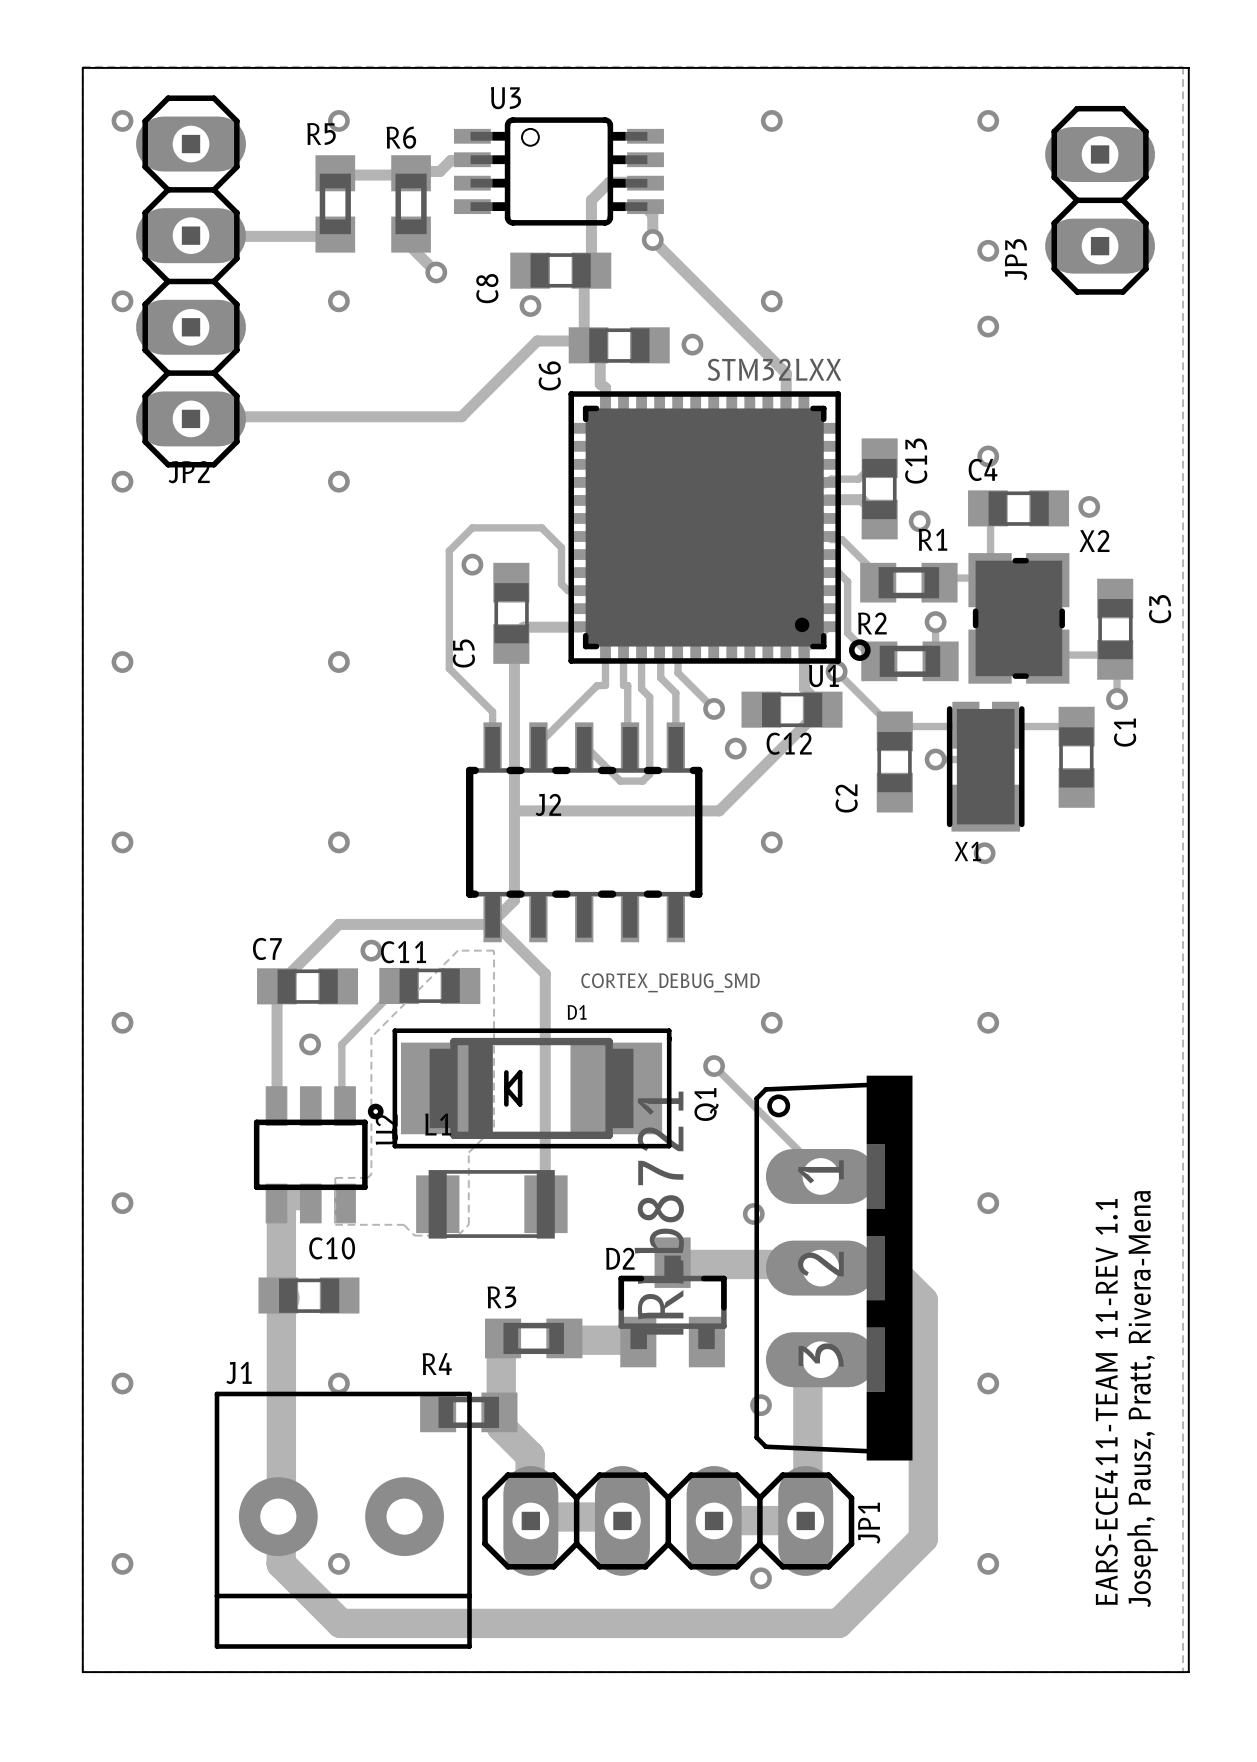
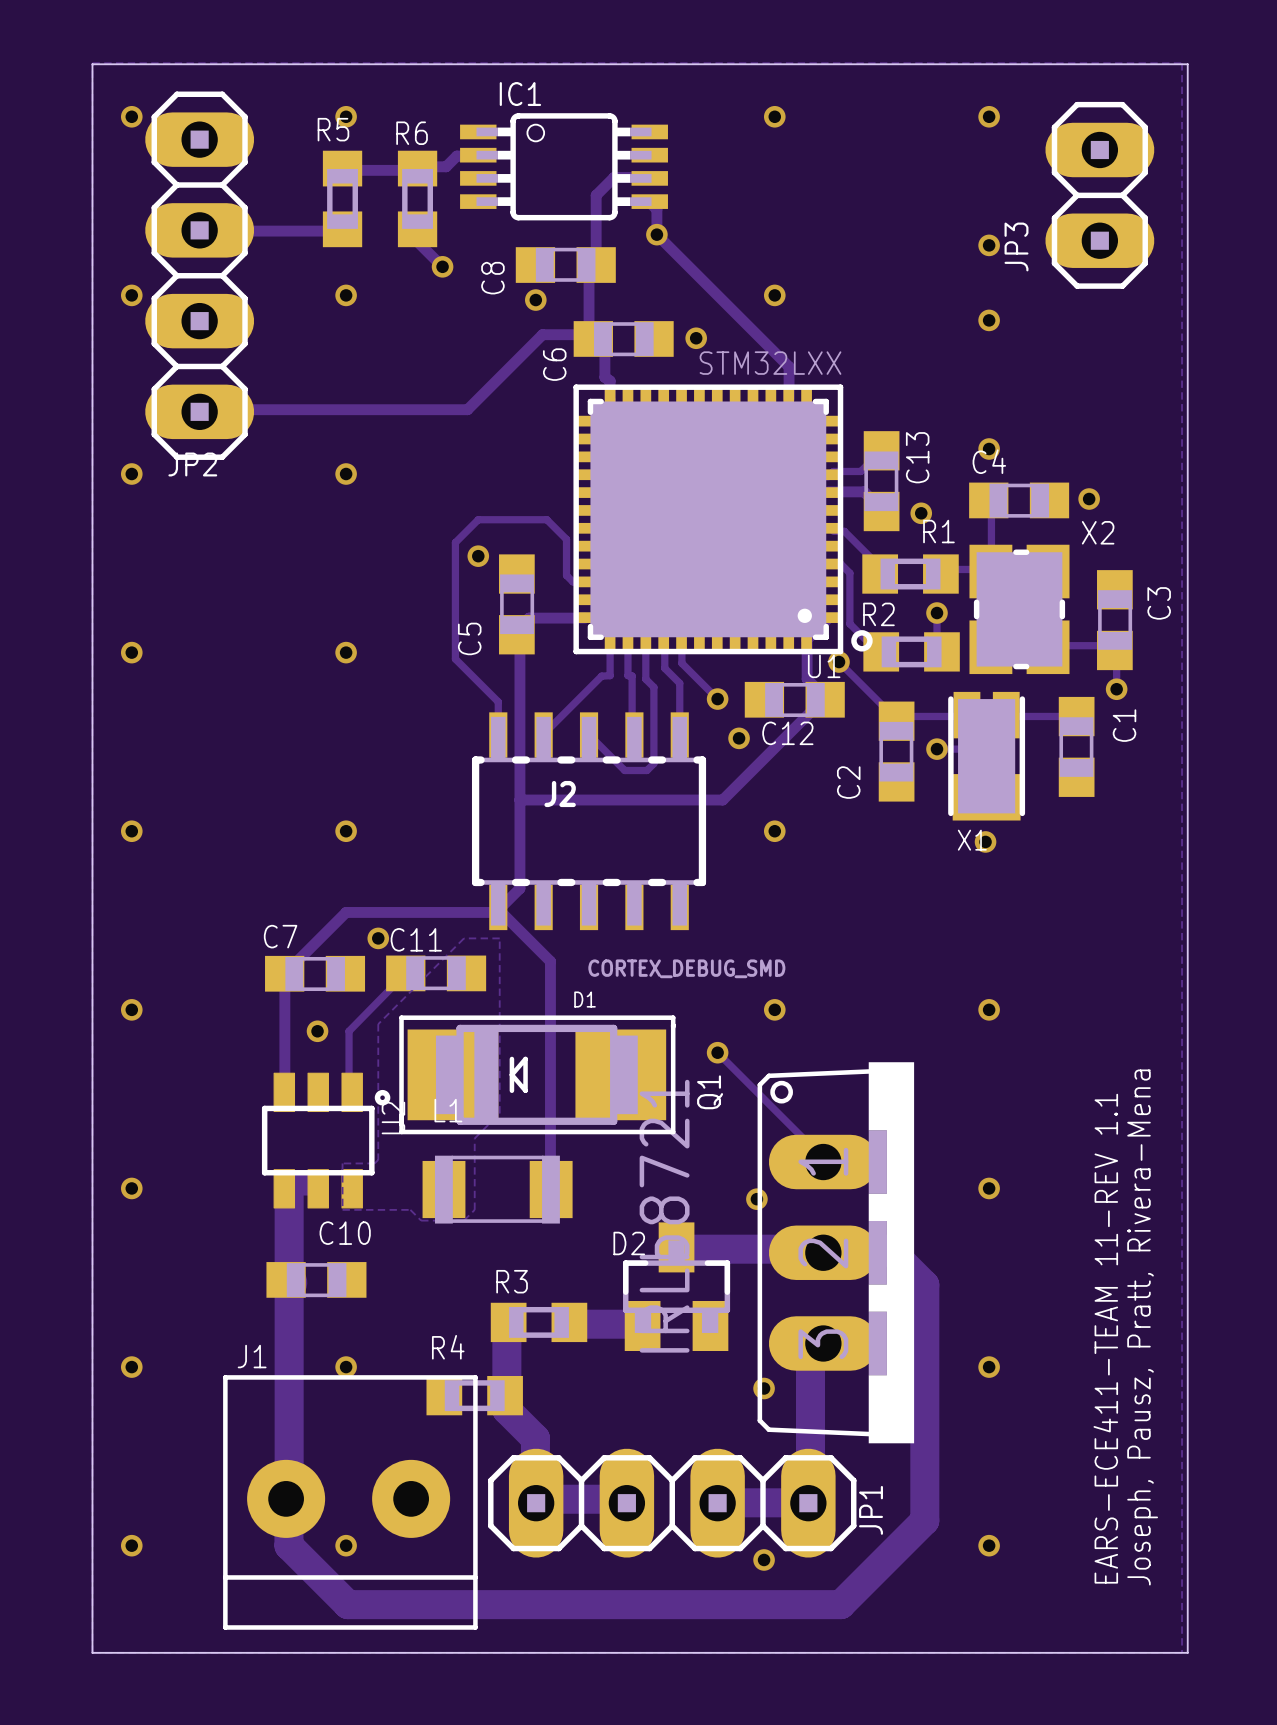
U3 name: U3 (505, 98) -> IC1 (520, 94)

